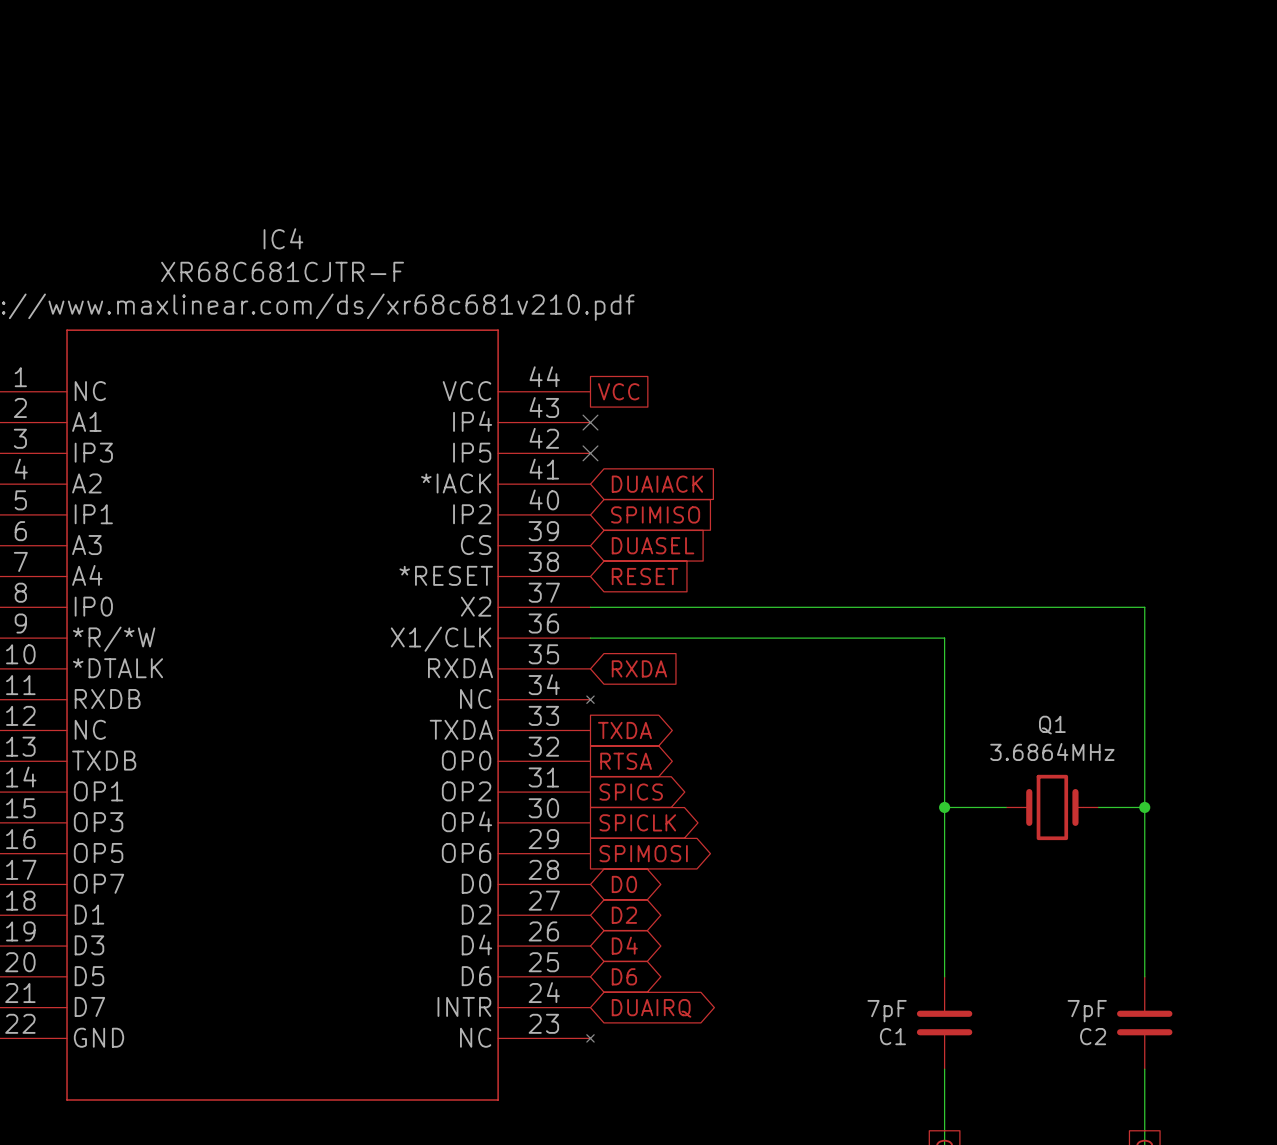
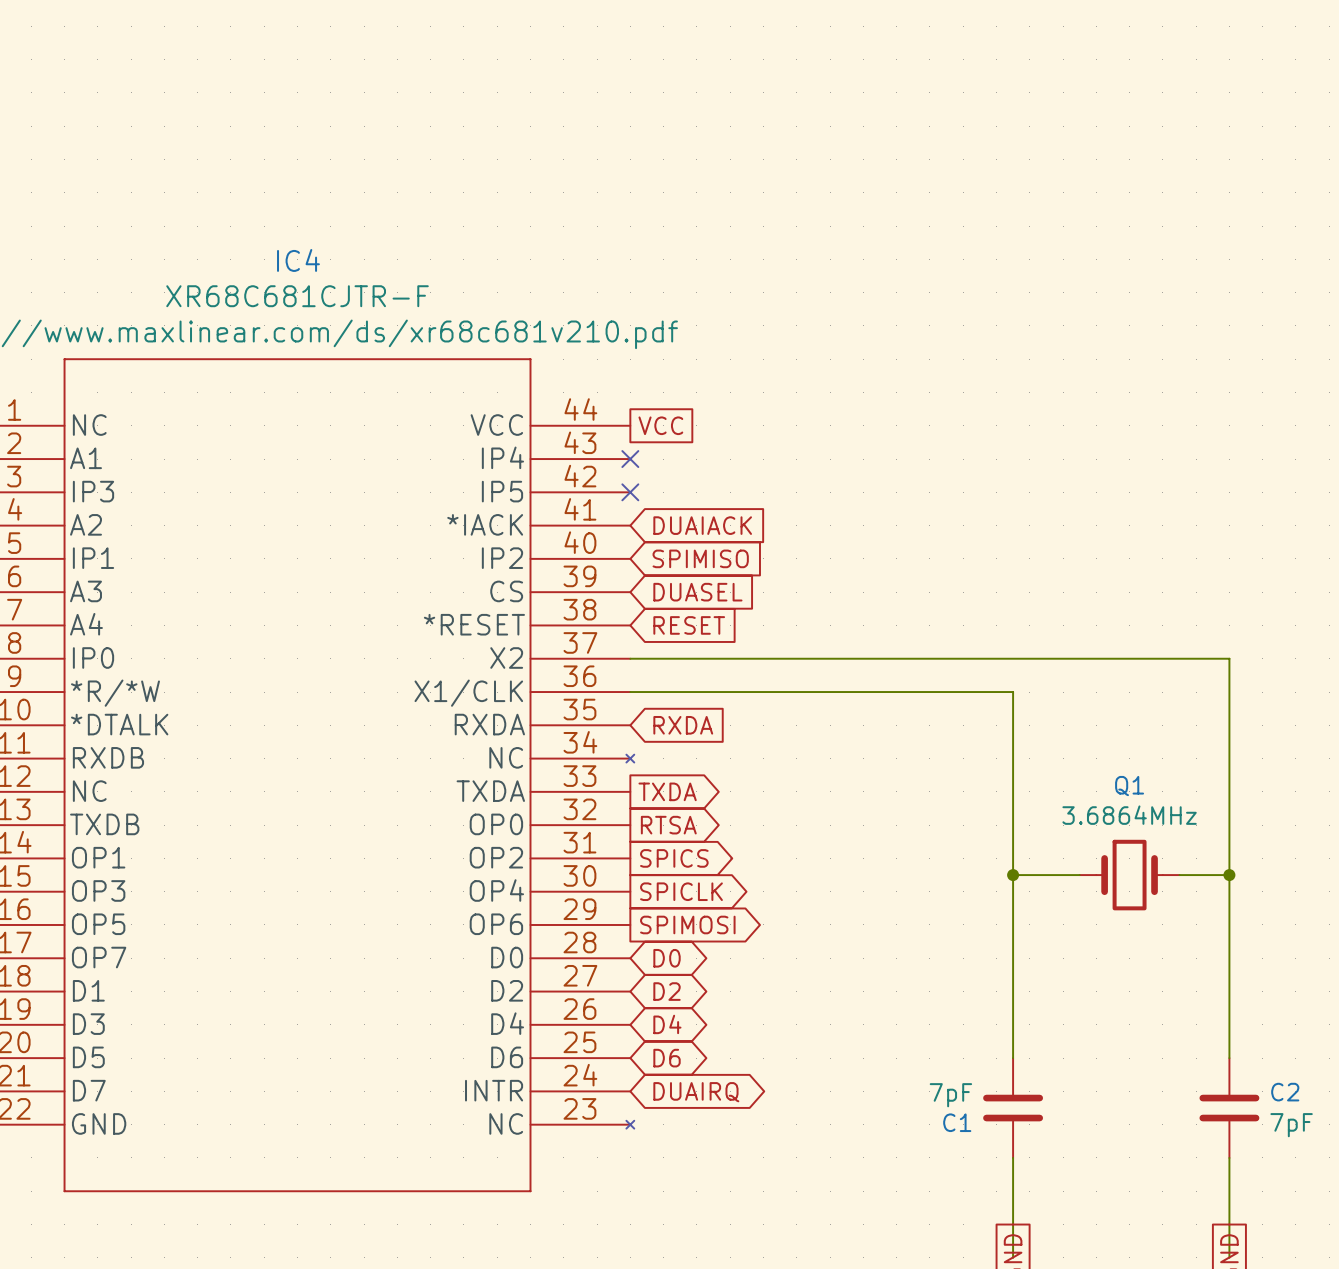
C2 value position: 7pF (1087, 1011) -> 7pF (1291, 1125)
C2 name position: C2 (1093, 1036) -> C2 (1285, 1092)

